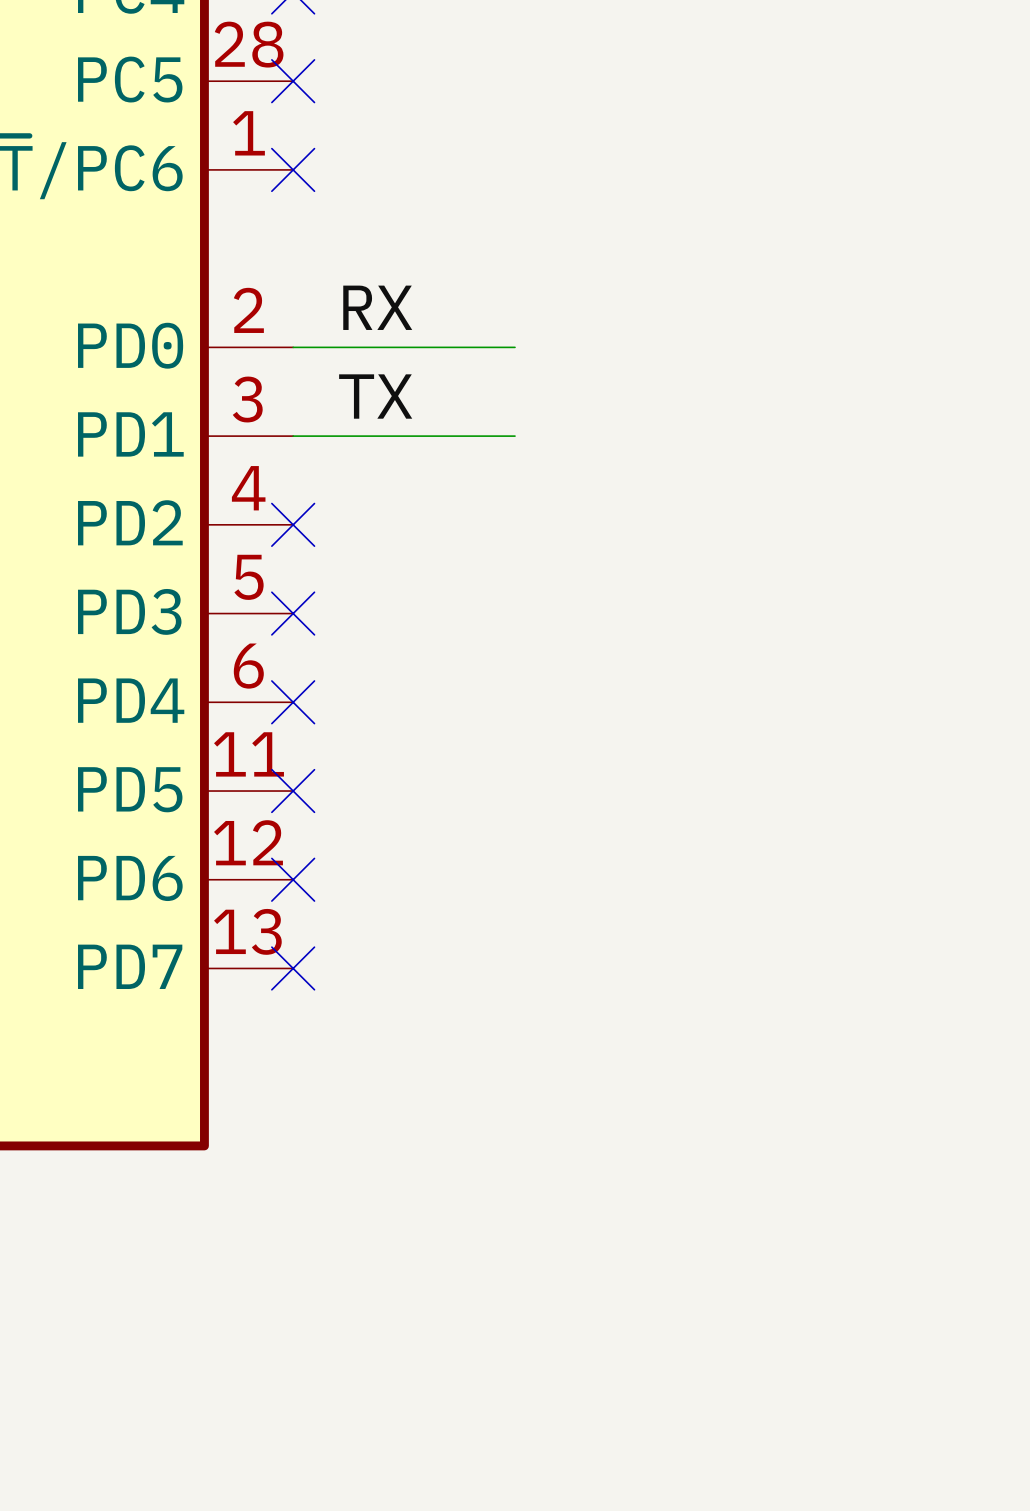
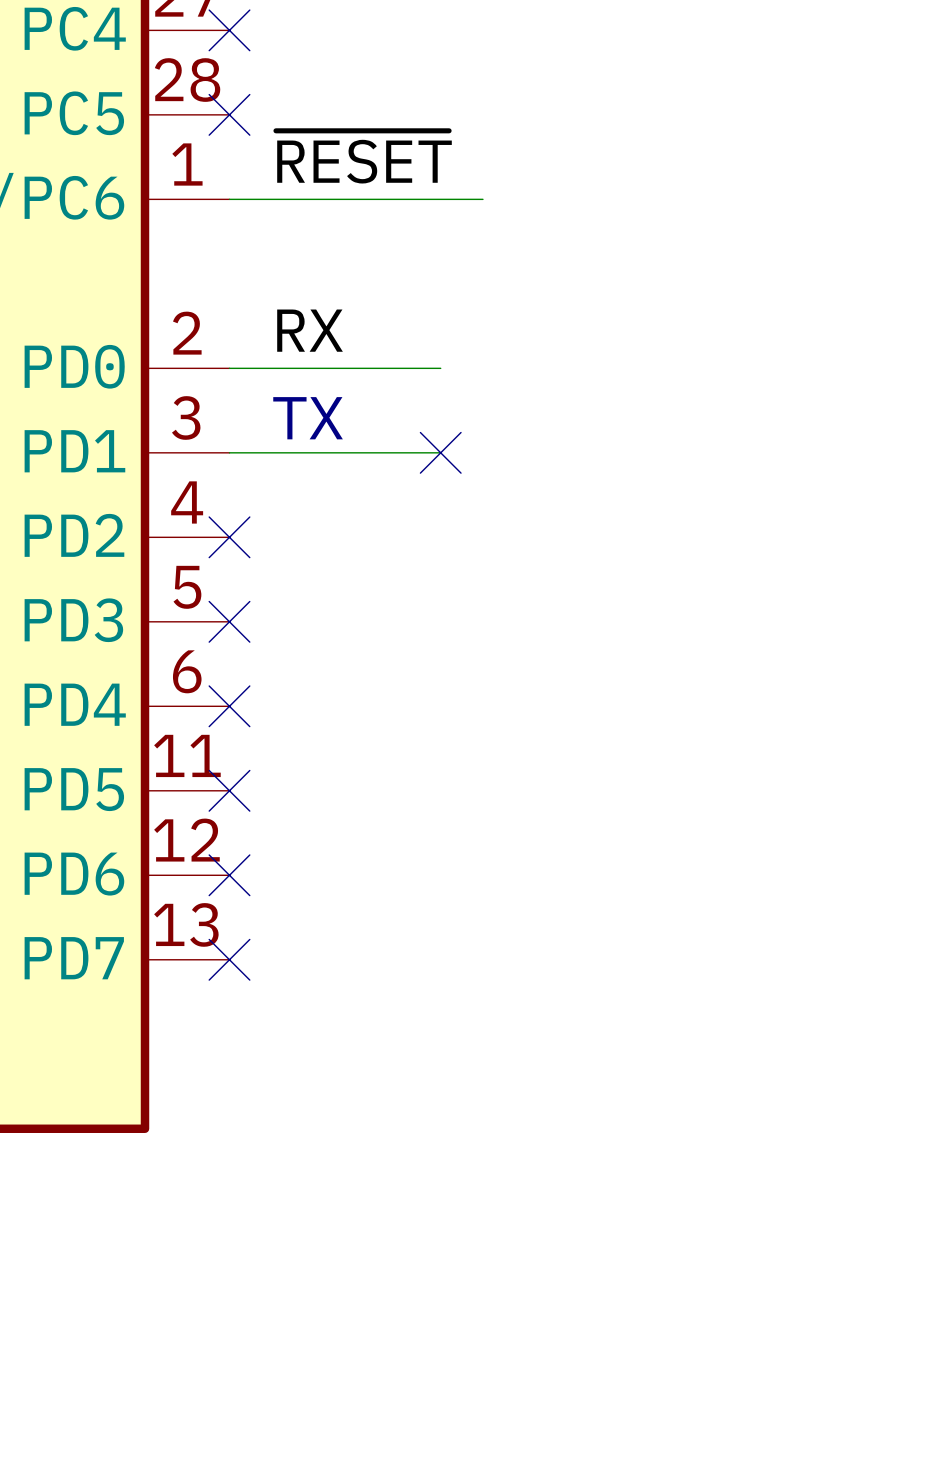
label: none -> ~{RESET} (363, 157)
wire: none -> (229, 199) (482, 199)
no-connect mark: (293, 169) -> none
label: TX (375, 396) -> none
text: none -> TX (308, 418)
no-connect mark: none -> (440, 452)

